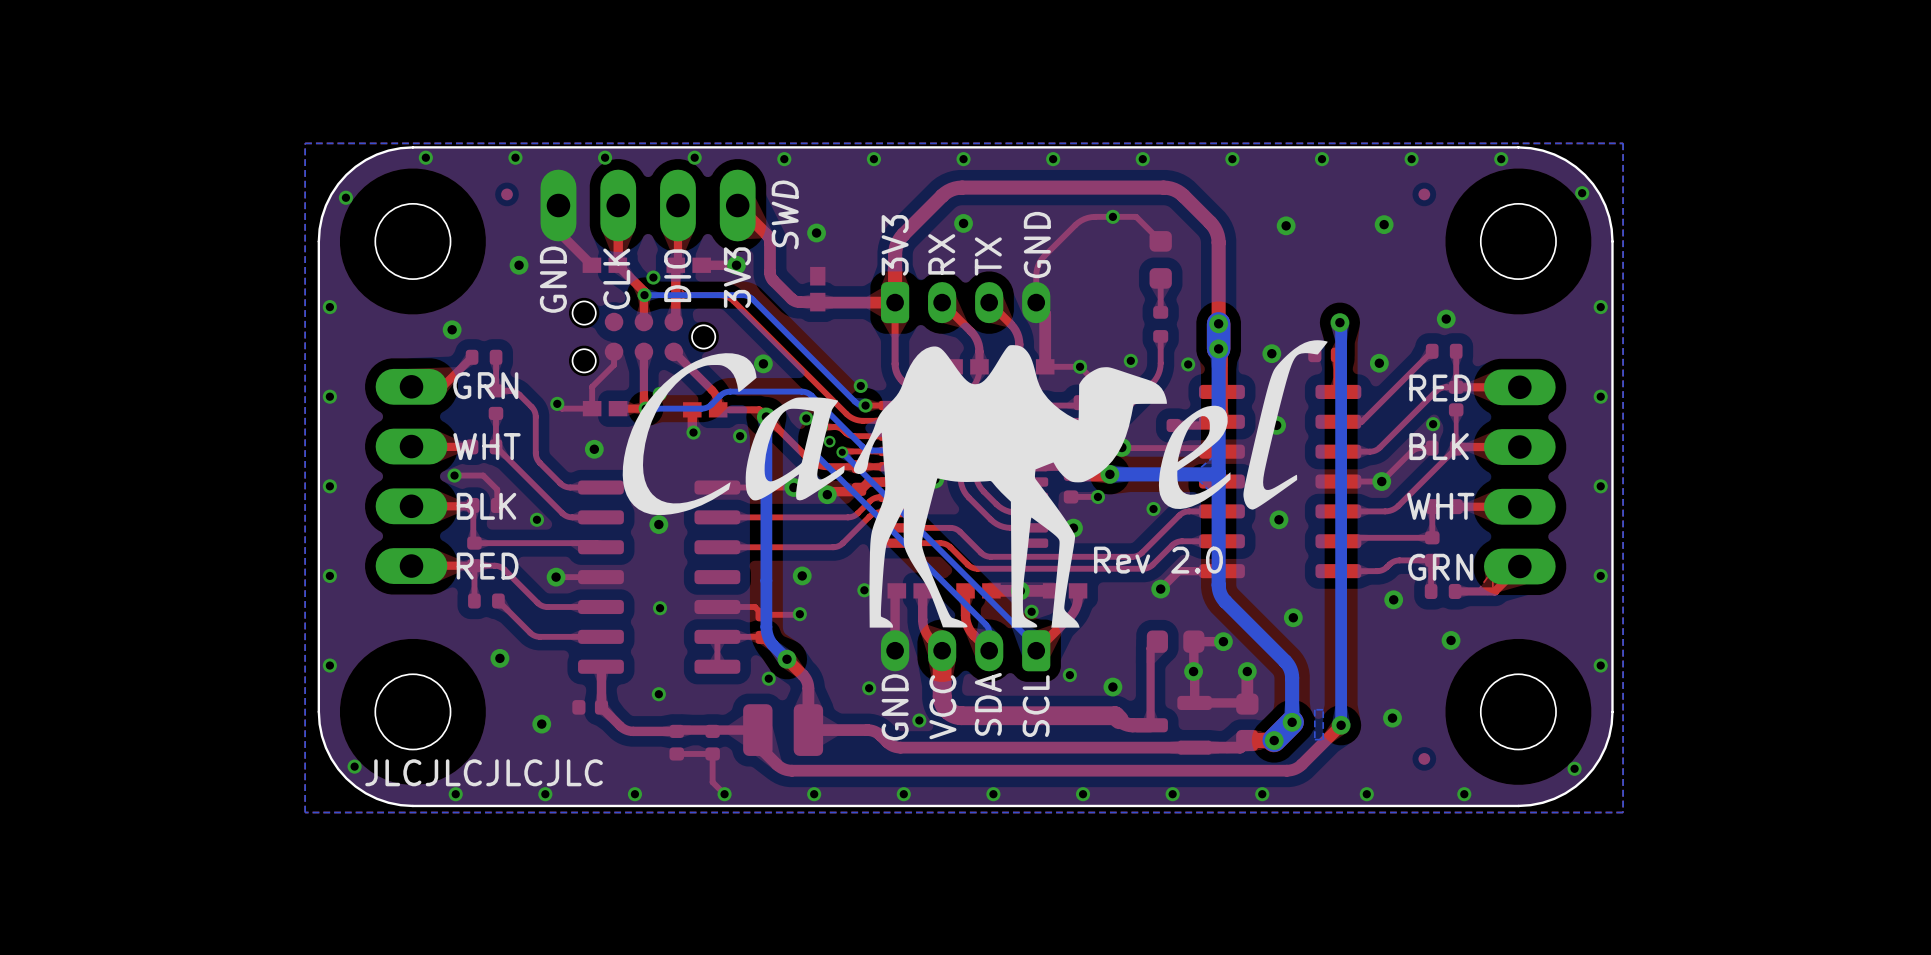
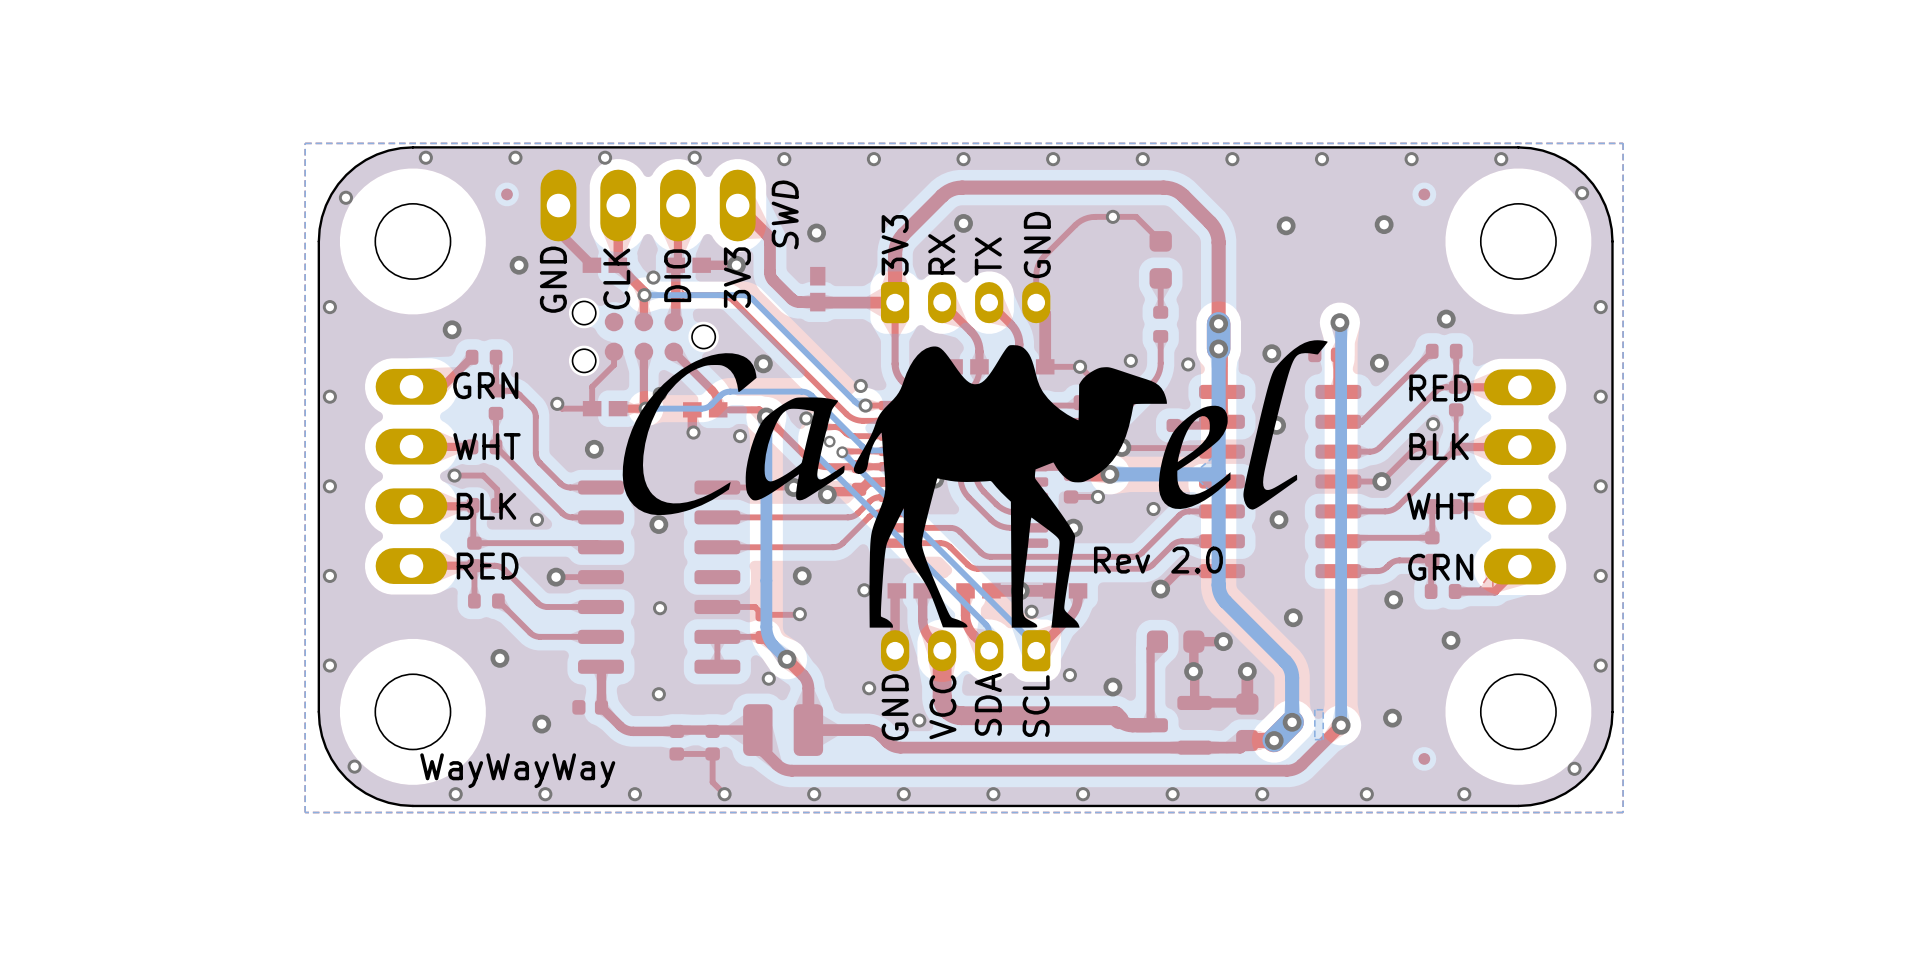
text: none -> WayWayWay (517, 770)
text: JLCJLCJLCJLC (484, 772) -> none

